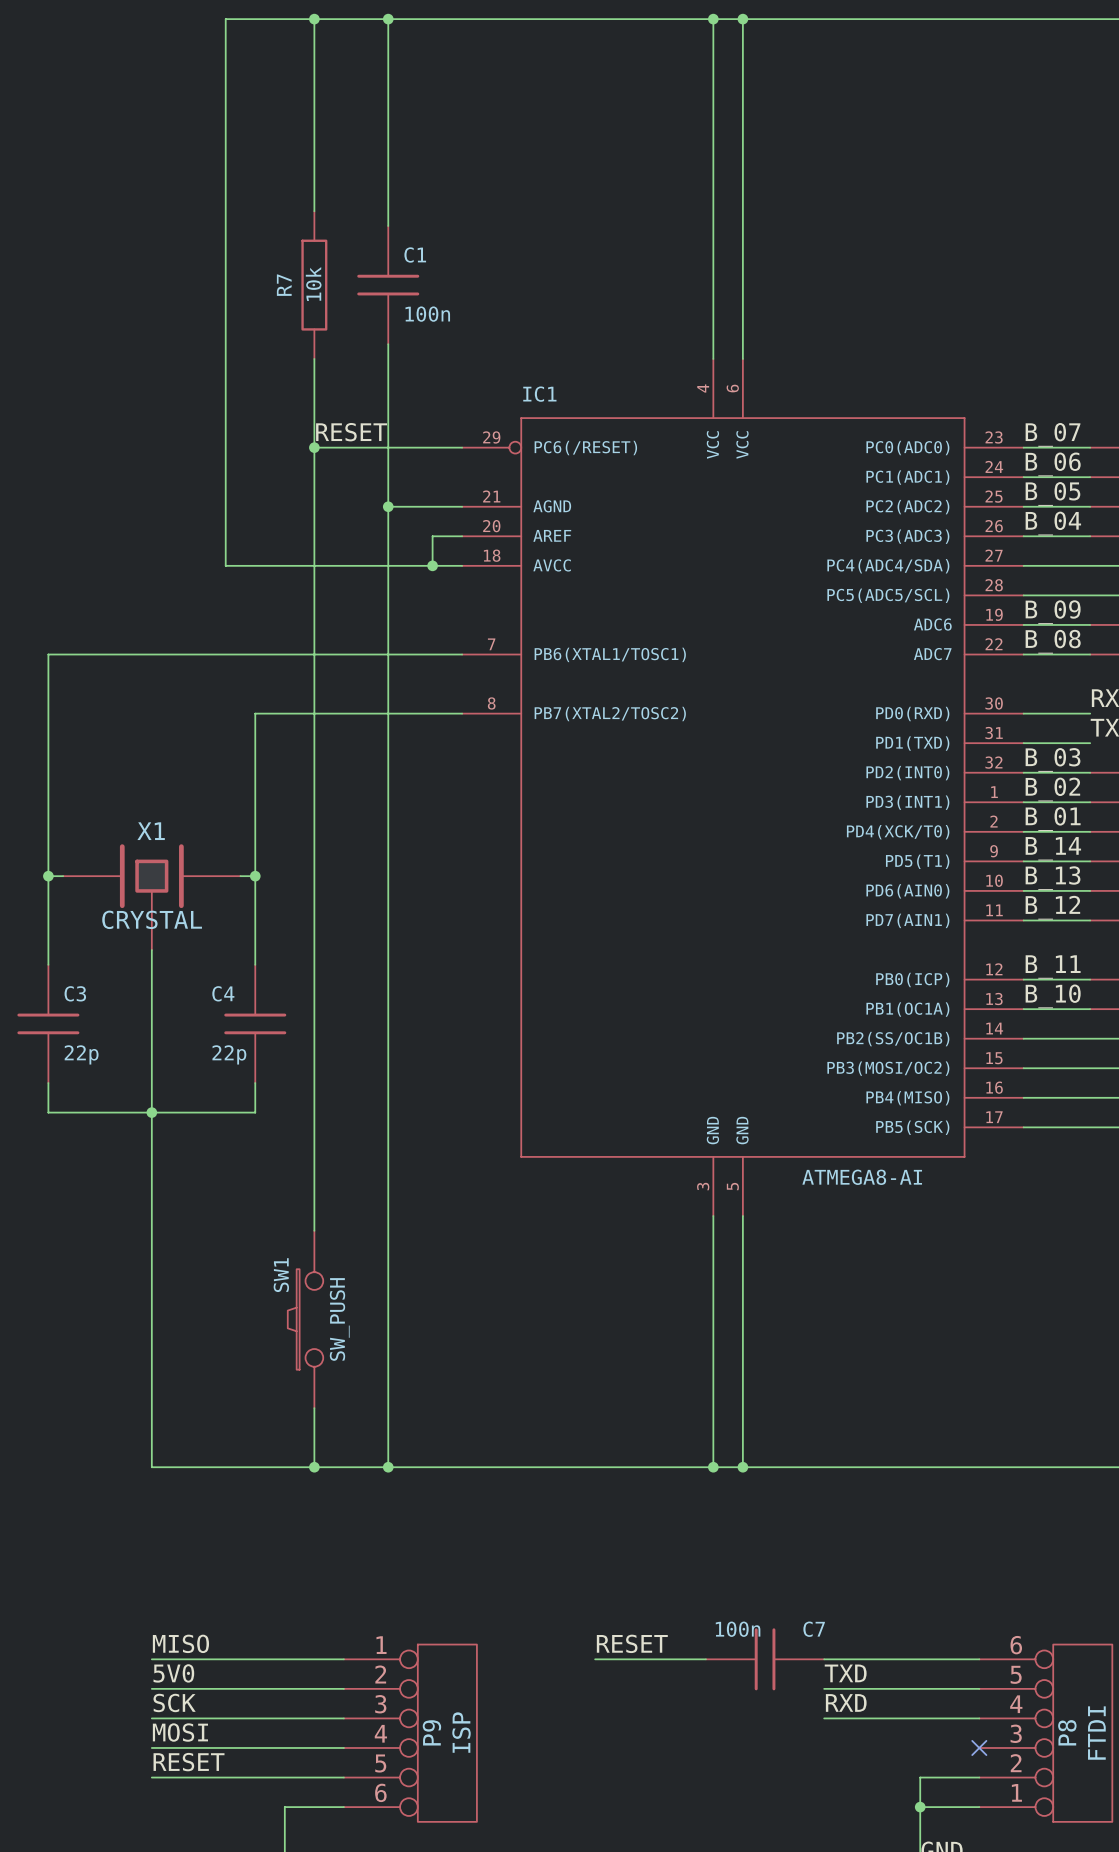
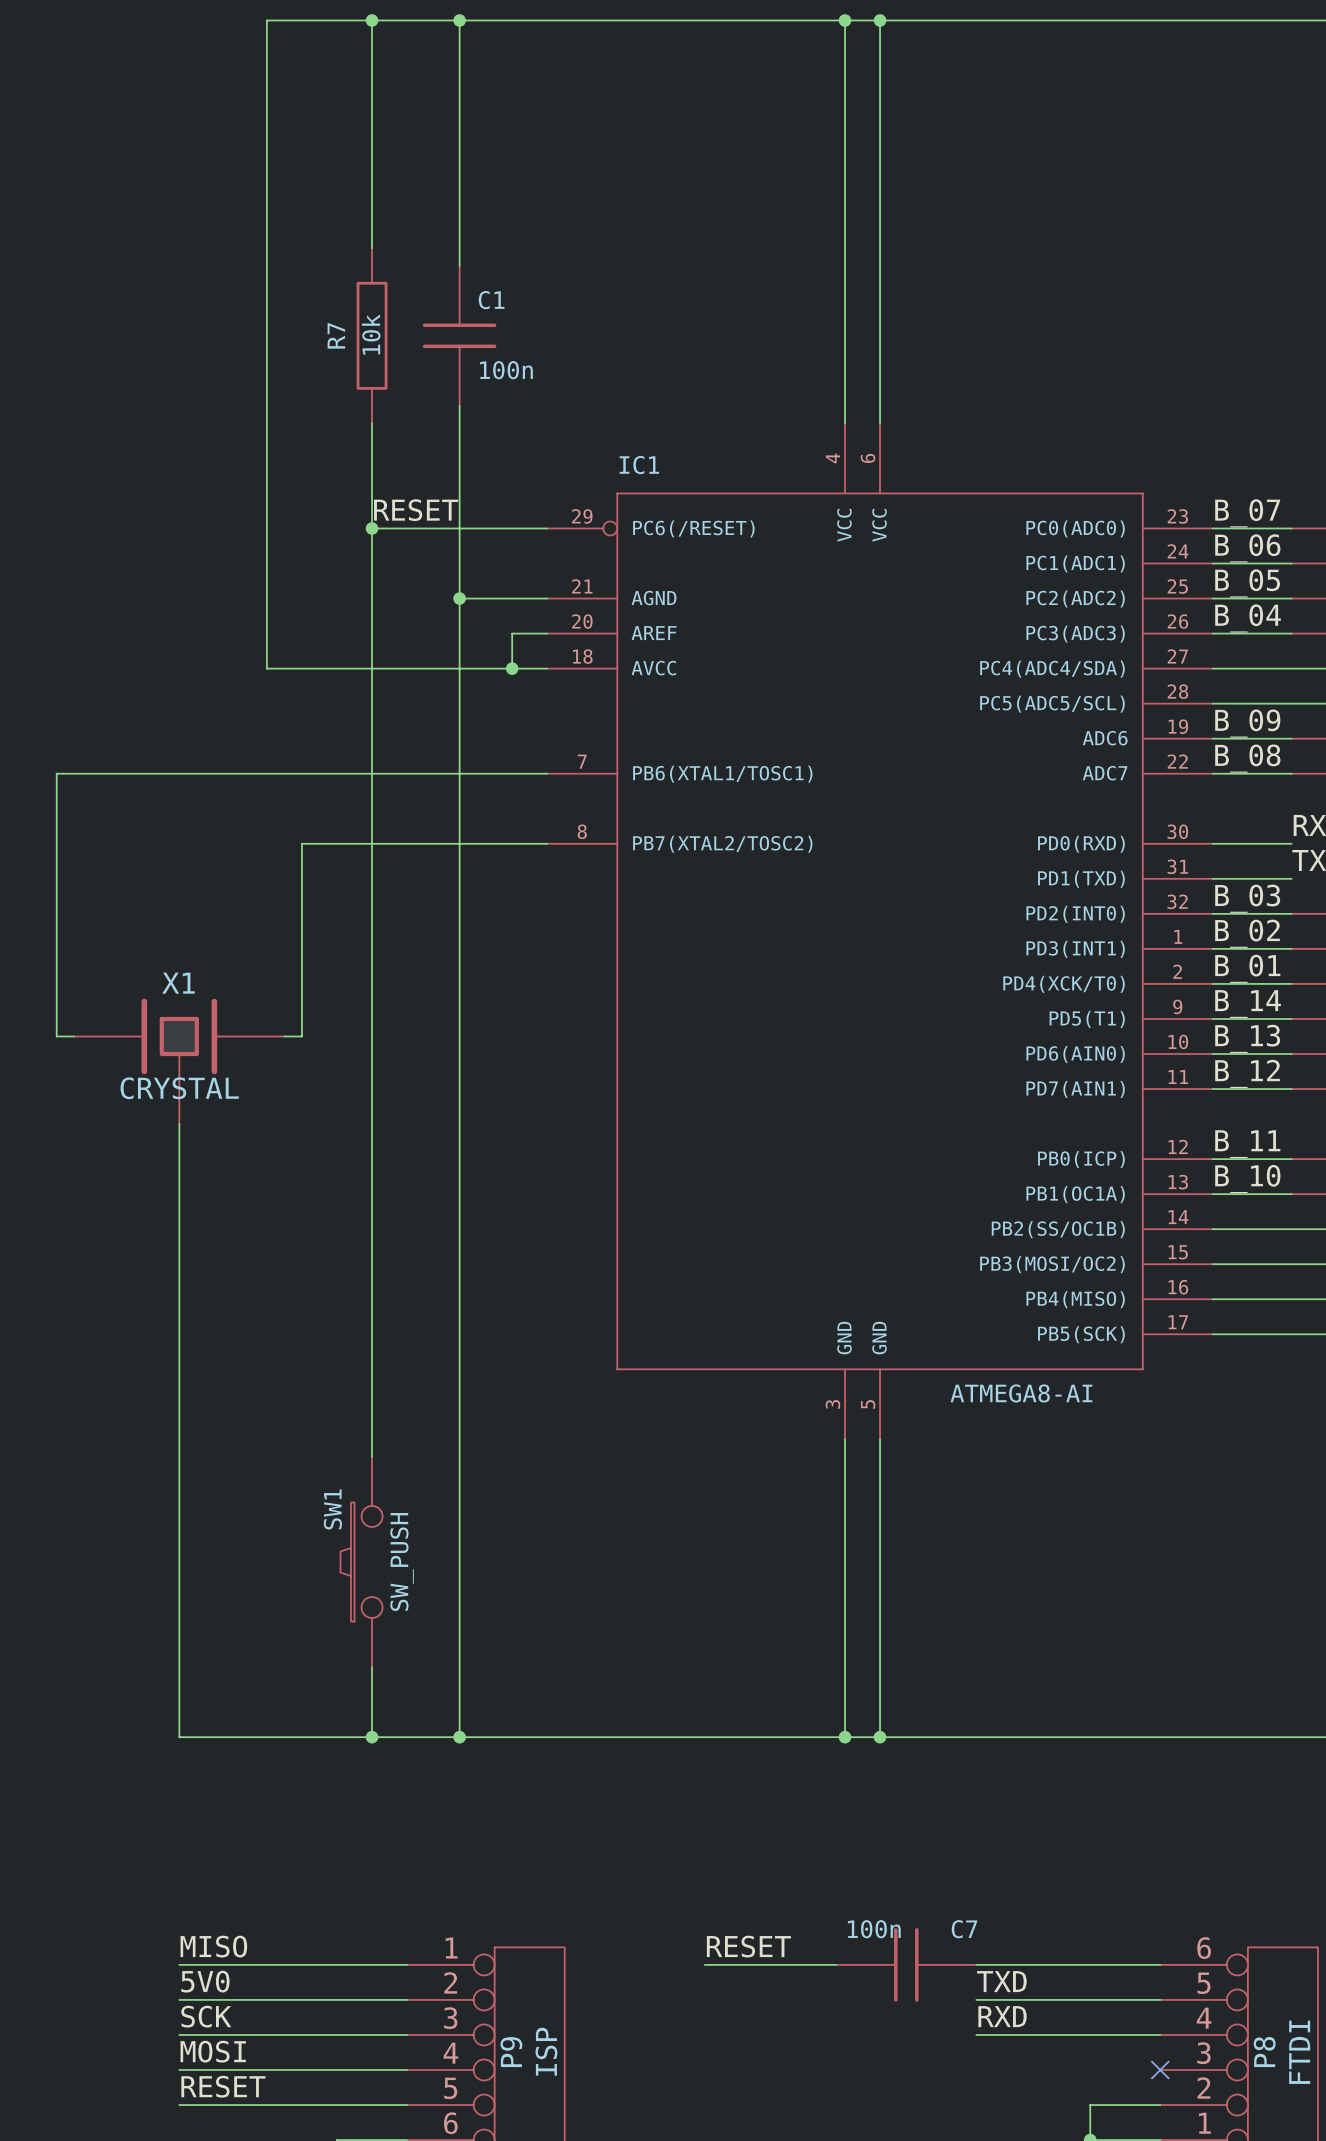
wire: (48, 876) (48, 964) -> none
junction: (48, 876) -> none
wire: (255, 876) (255, 964) -> none
junction: (255, 876) -> none
C3: 22p (48, 1023) -> none
C4: 22p (255, 1023) -> none
wire: (48, 1083) (48, 1112) (255, 1112) (255, 1083) -> none
junction: (151, 1112) -> none

